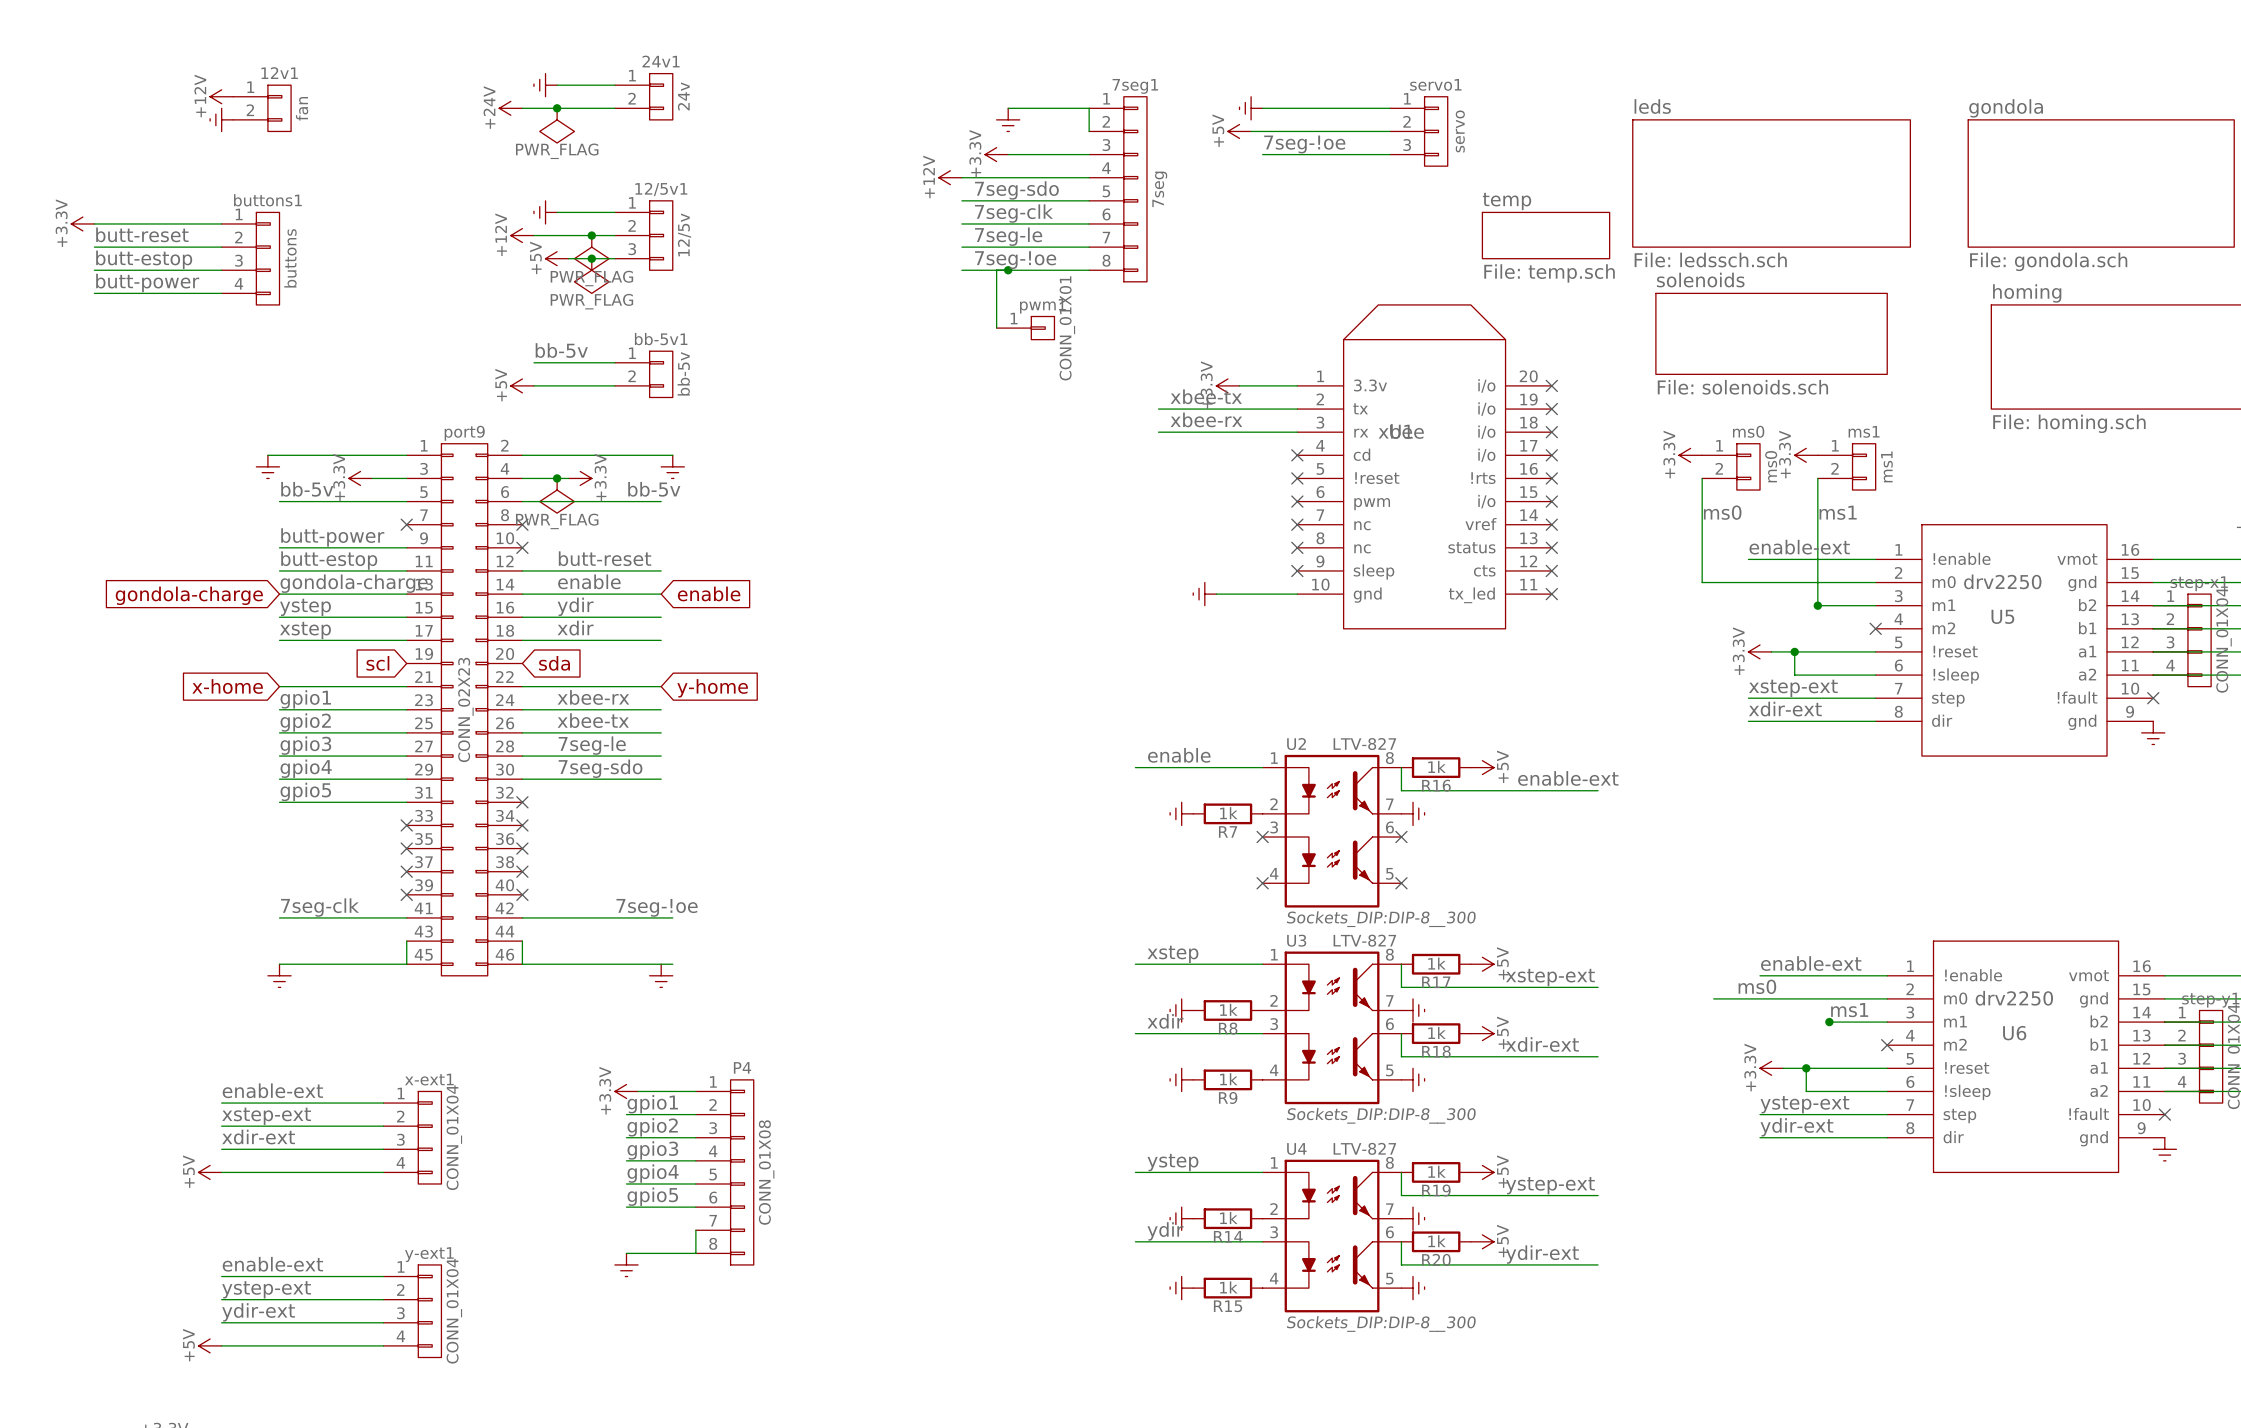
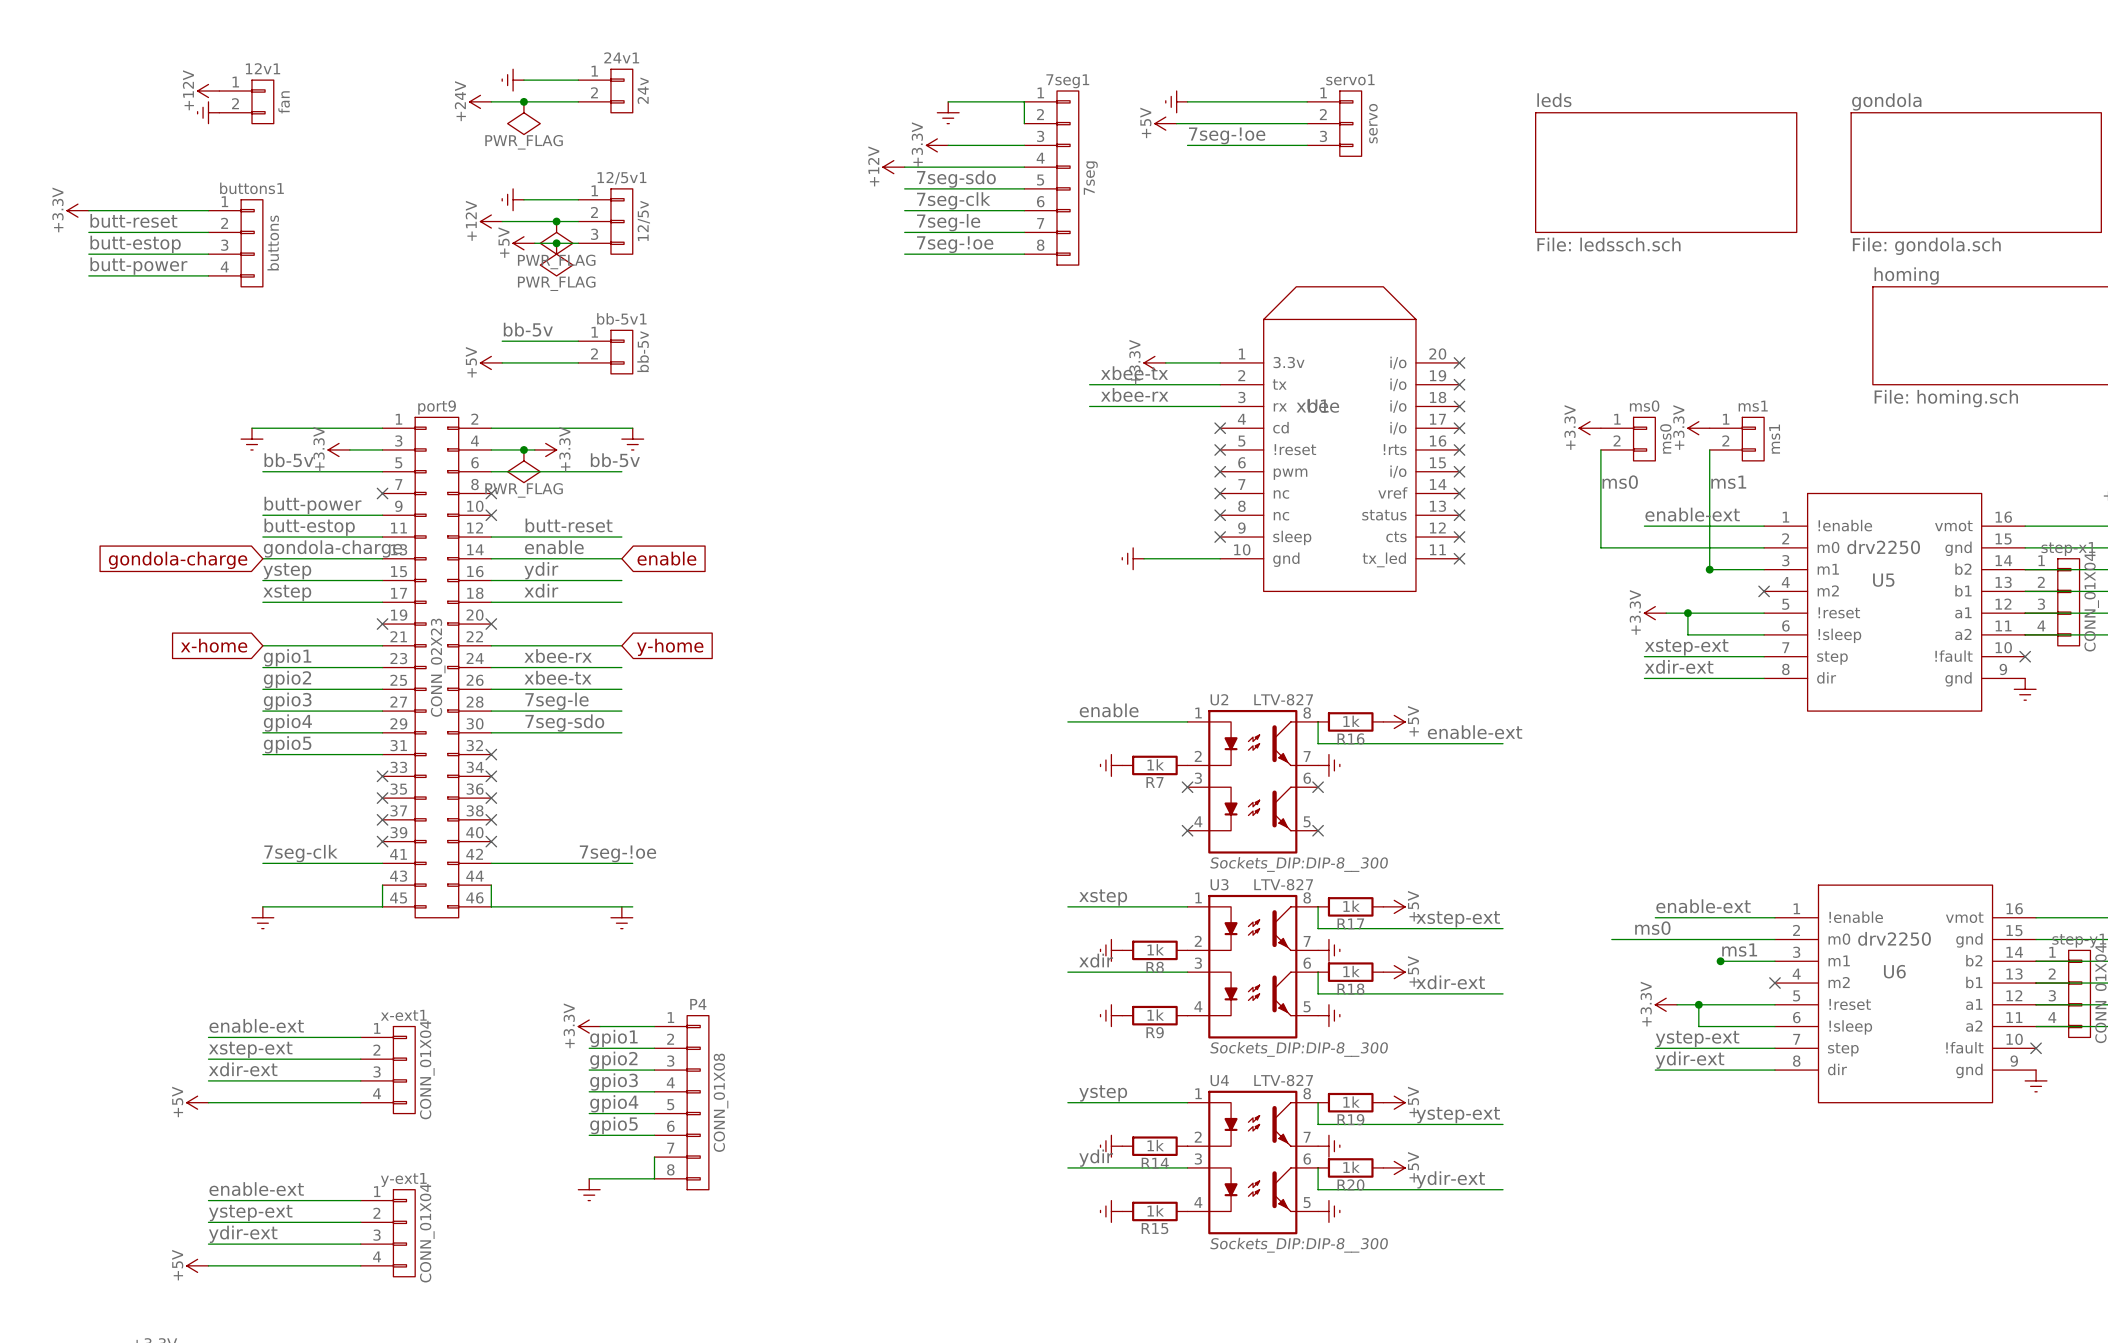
sheet temp: File: temp.sch (1546, 235) -> none
wire: (996, 270) (996, 328) -> none
junction: (1008, 270) -> none
pwm1: CONN_01X01 (1025, 328) -> none
sheet solenoids: File: solenoids.sch (1771, 333) -> none
global label: scl (377, 663) -> none
no-connect mark: none -> (382, 624)
no-connect mark: none -> (491, 624)
global label: sda (554, 663) -> none

